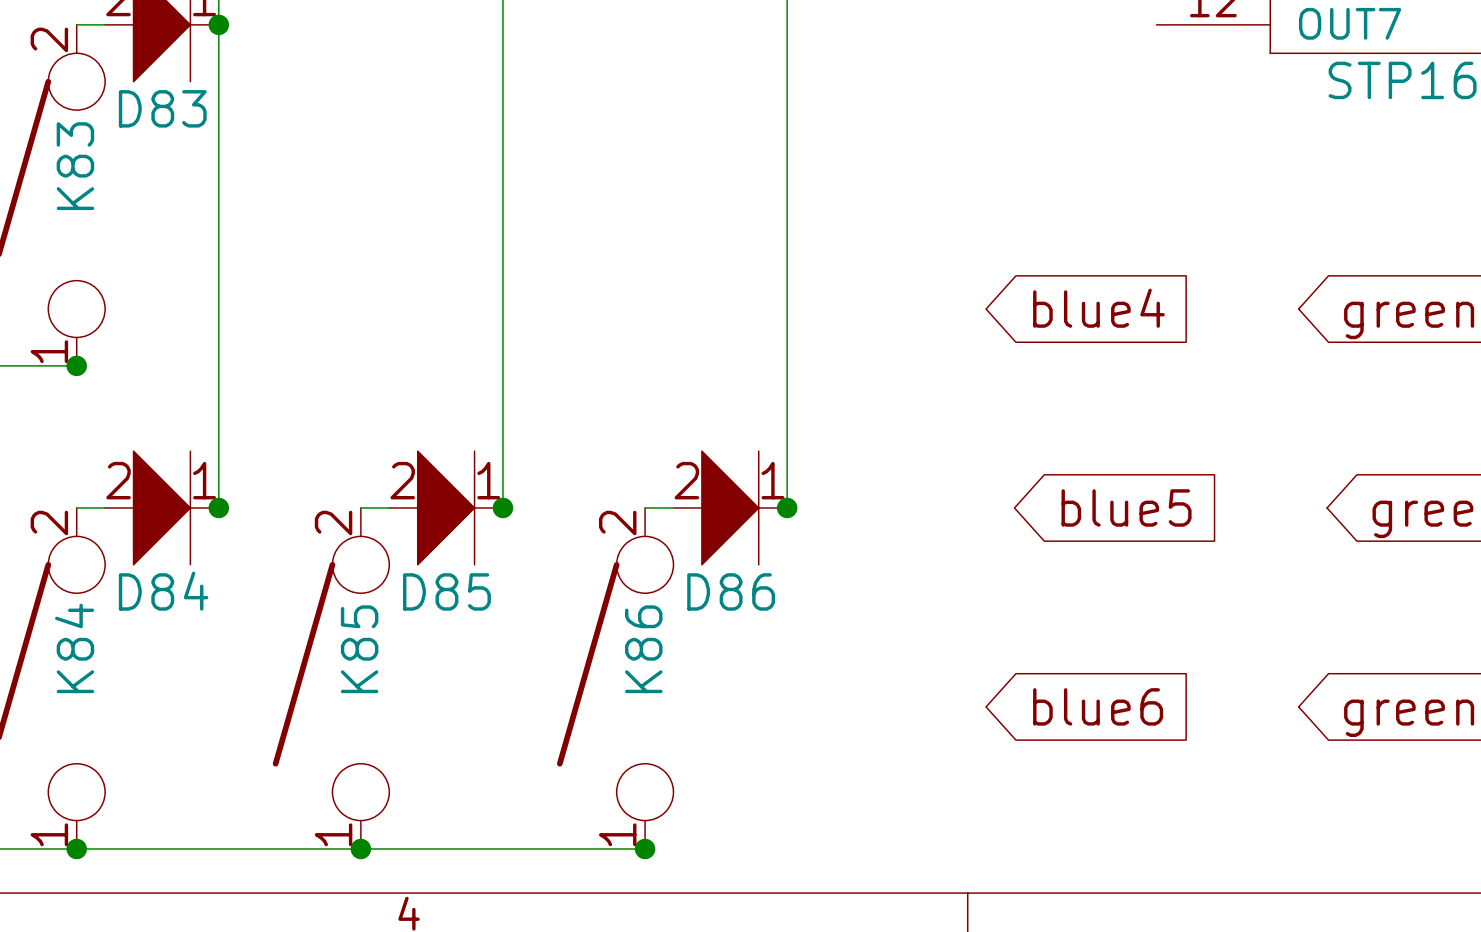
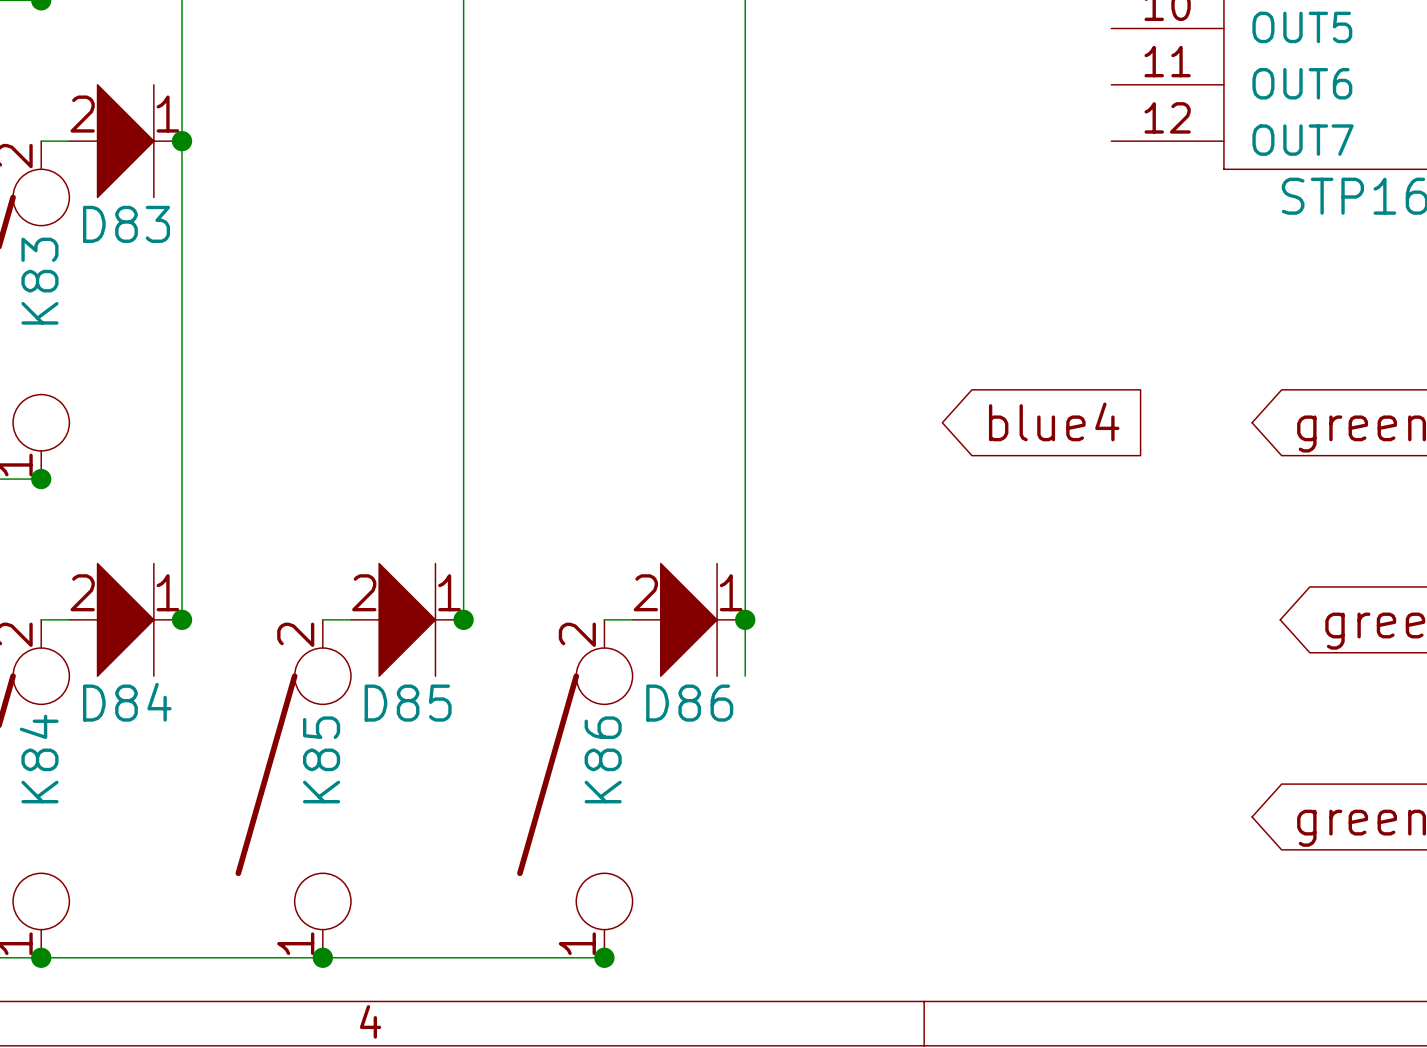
wire: none -> (745, 619) (745, 676)
global label: blue5 (1126, 507) -> none
global label: blue6 (1098, 706) -> none

